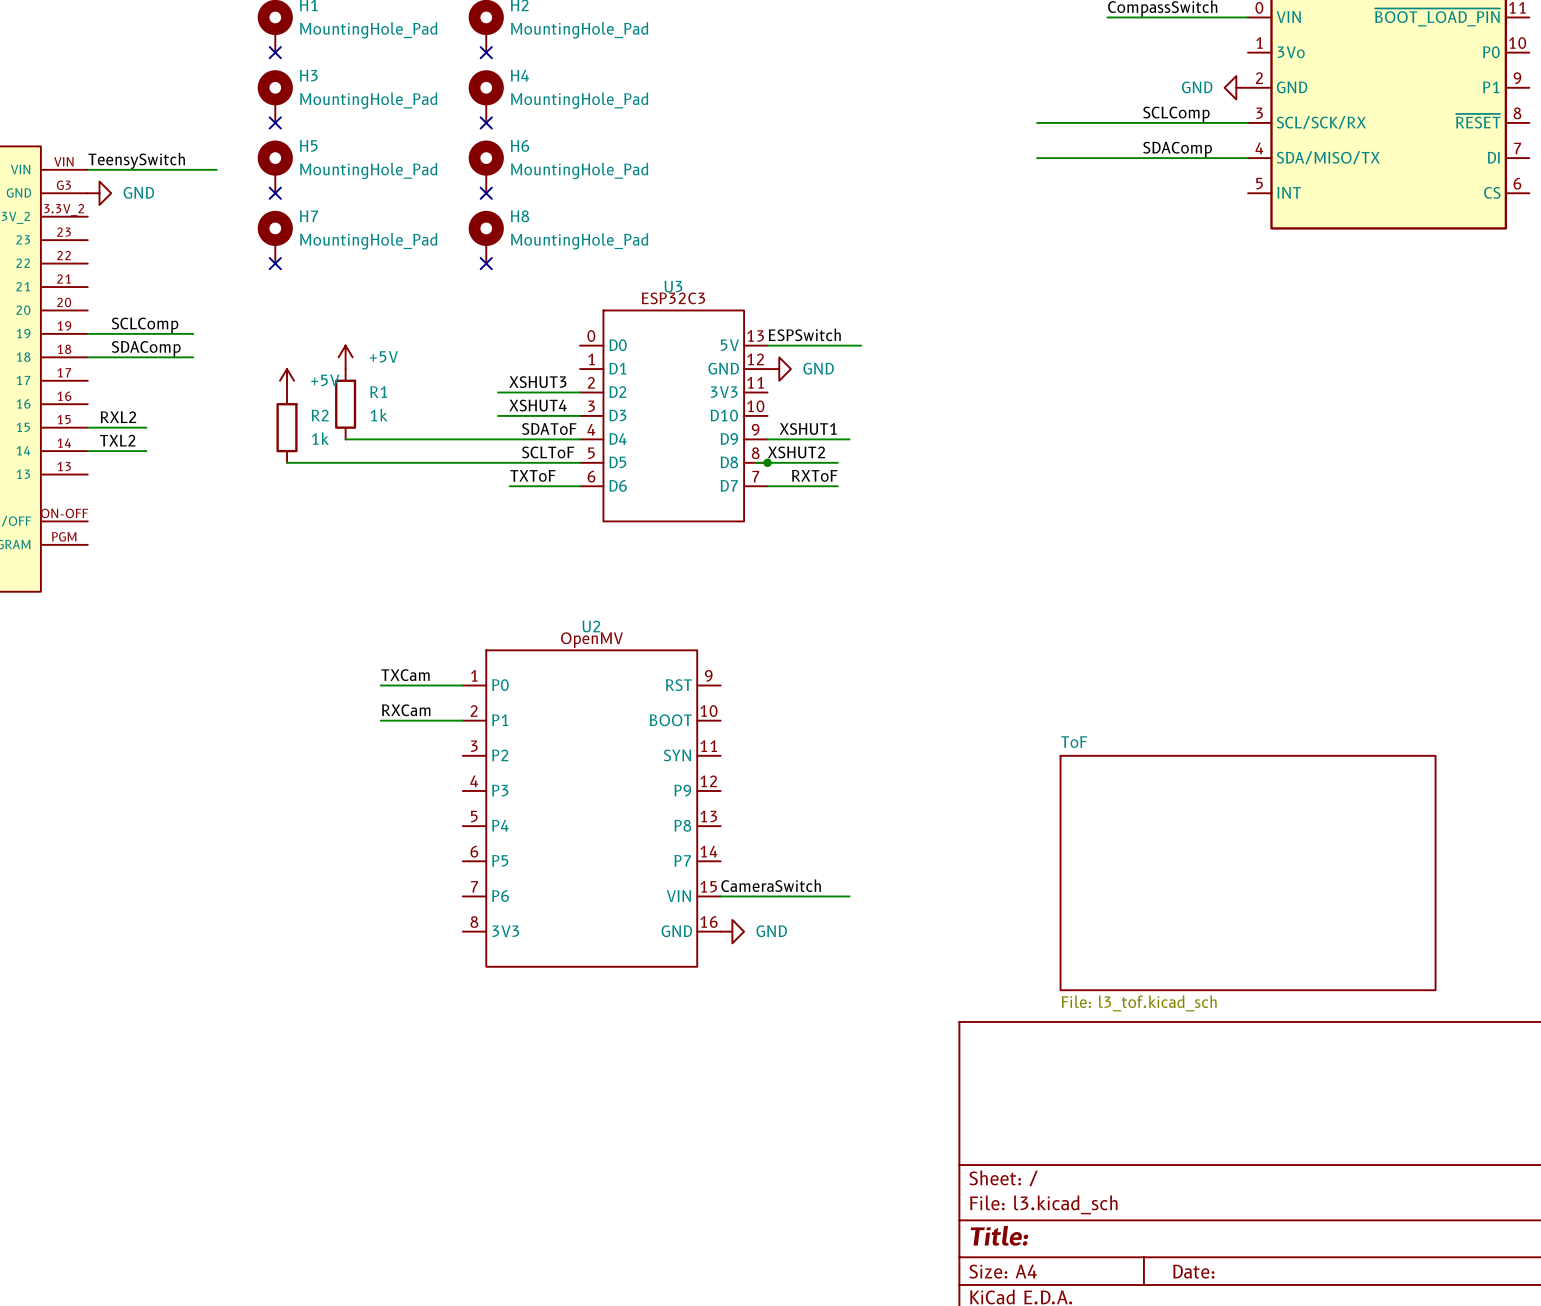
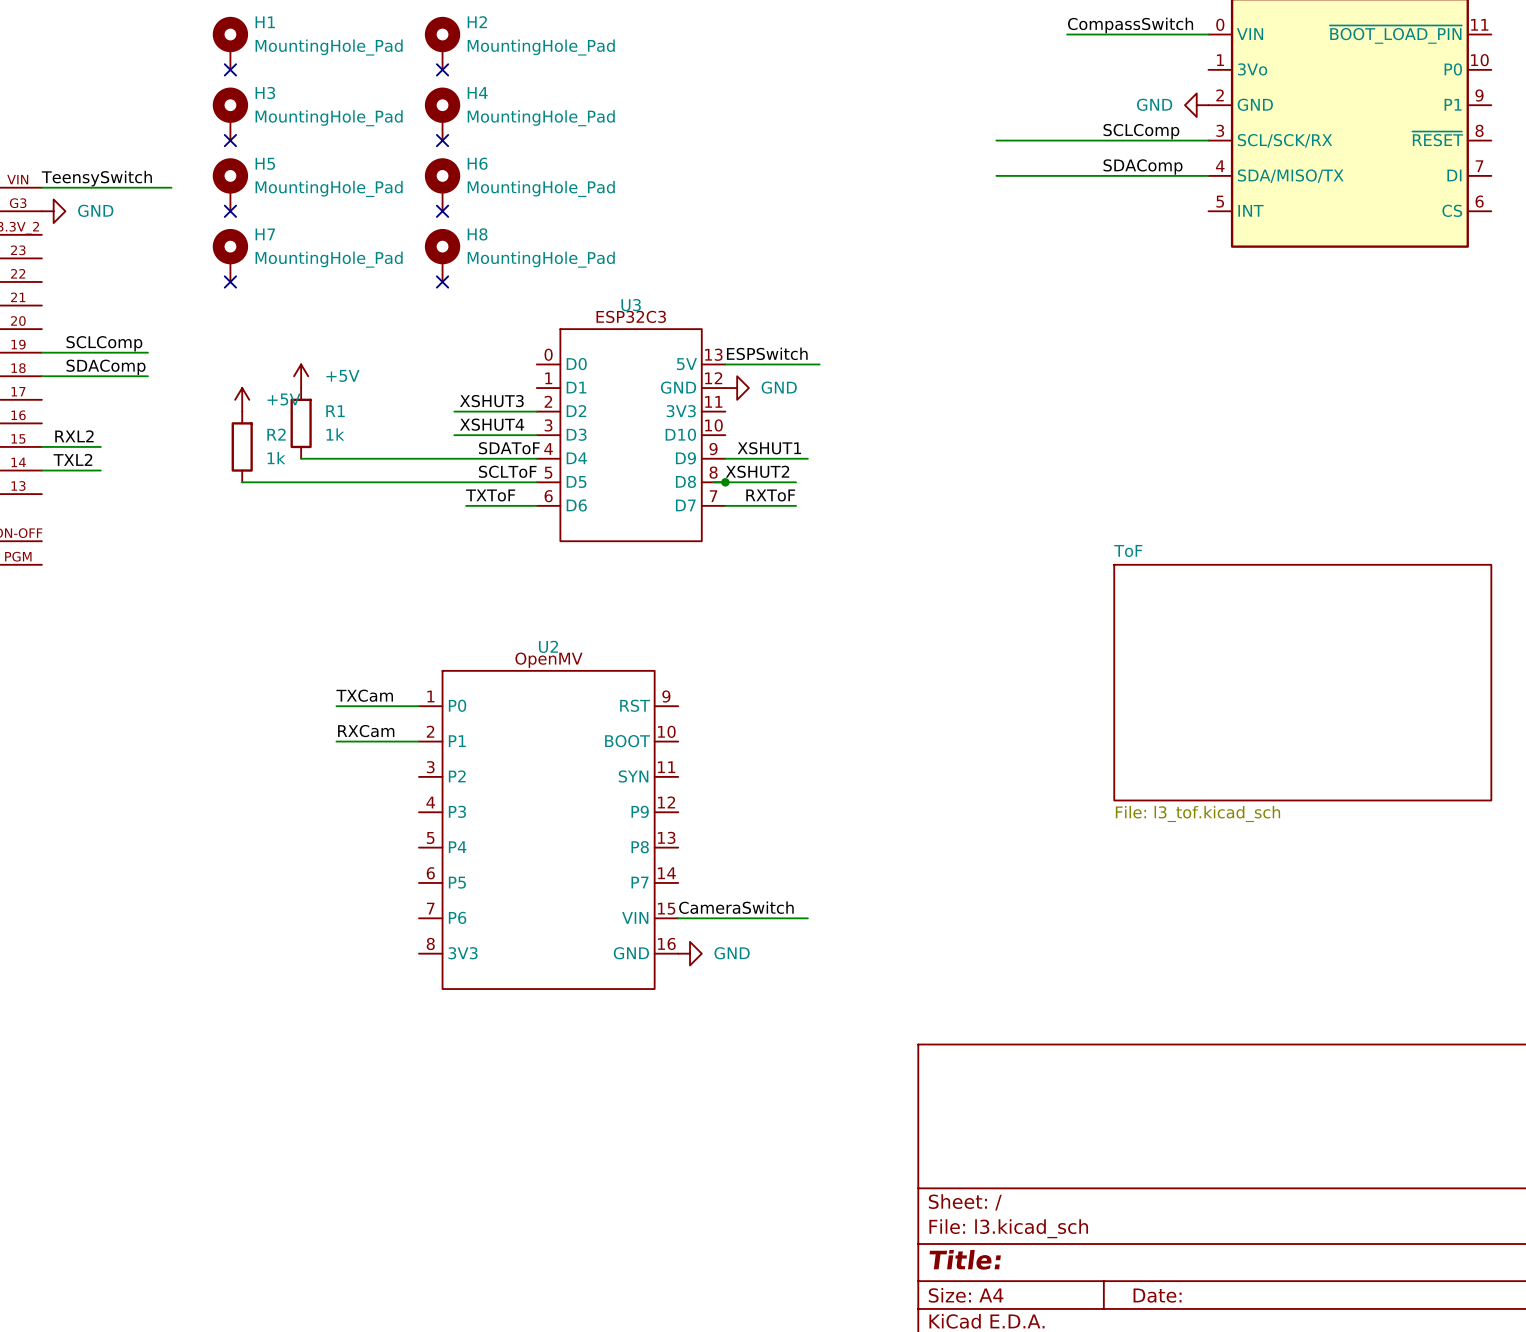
sheet ToF: none -> File: l3_tof.kicad_sch (1302, 682)
sheet ToF: File: l3_tof.kicad_sch (1248, 873) -> none

